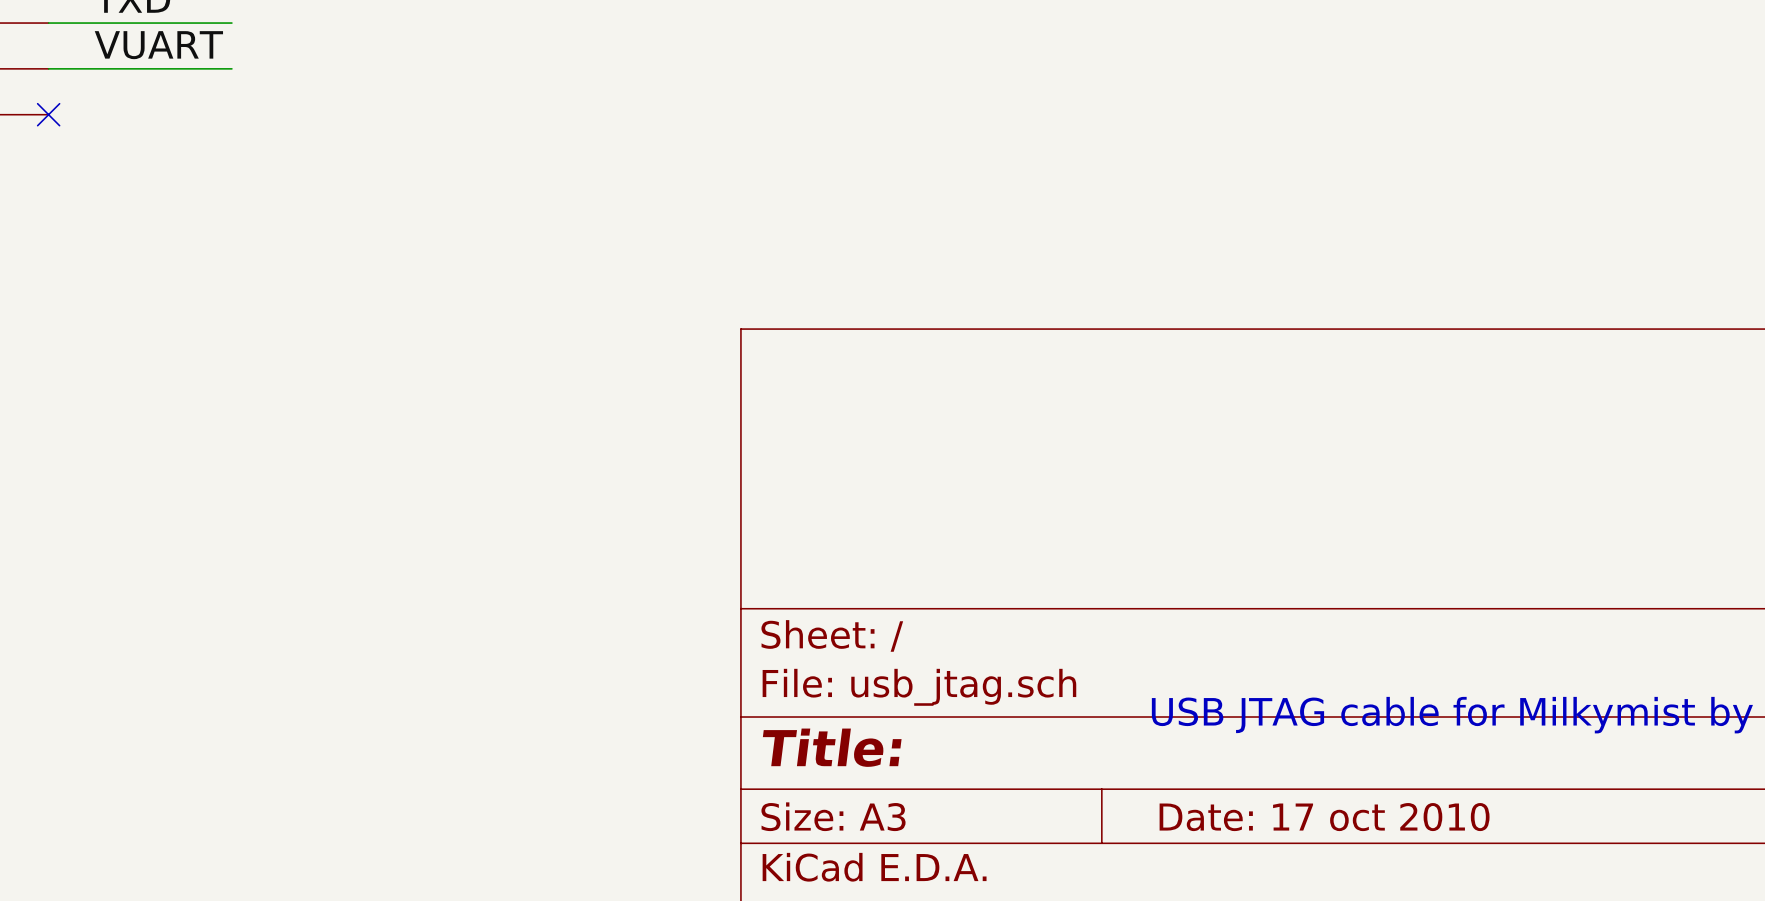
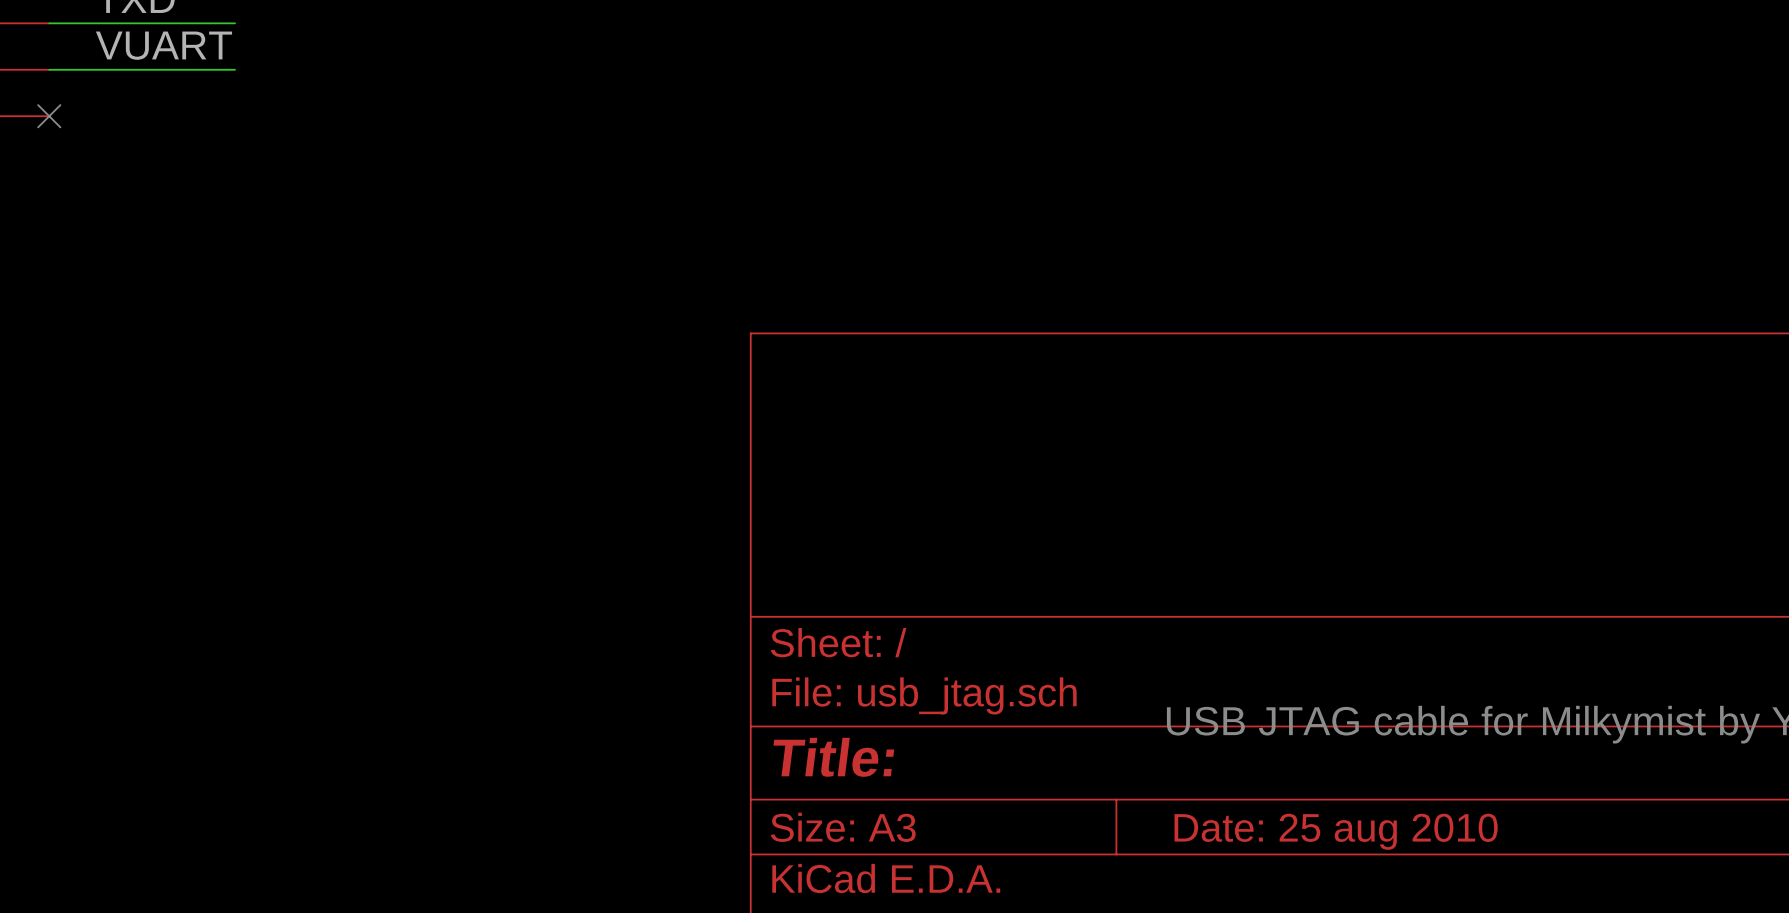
title block: Date: 17 oct 2010 (1324, 817) -> Date: 25 aug 2010 (1336, 831)

